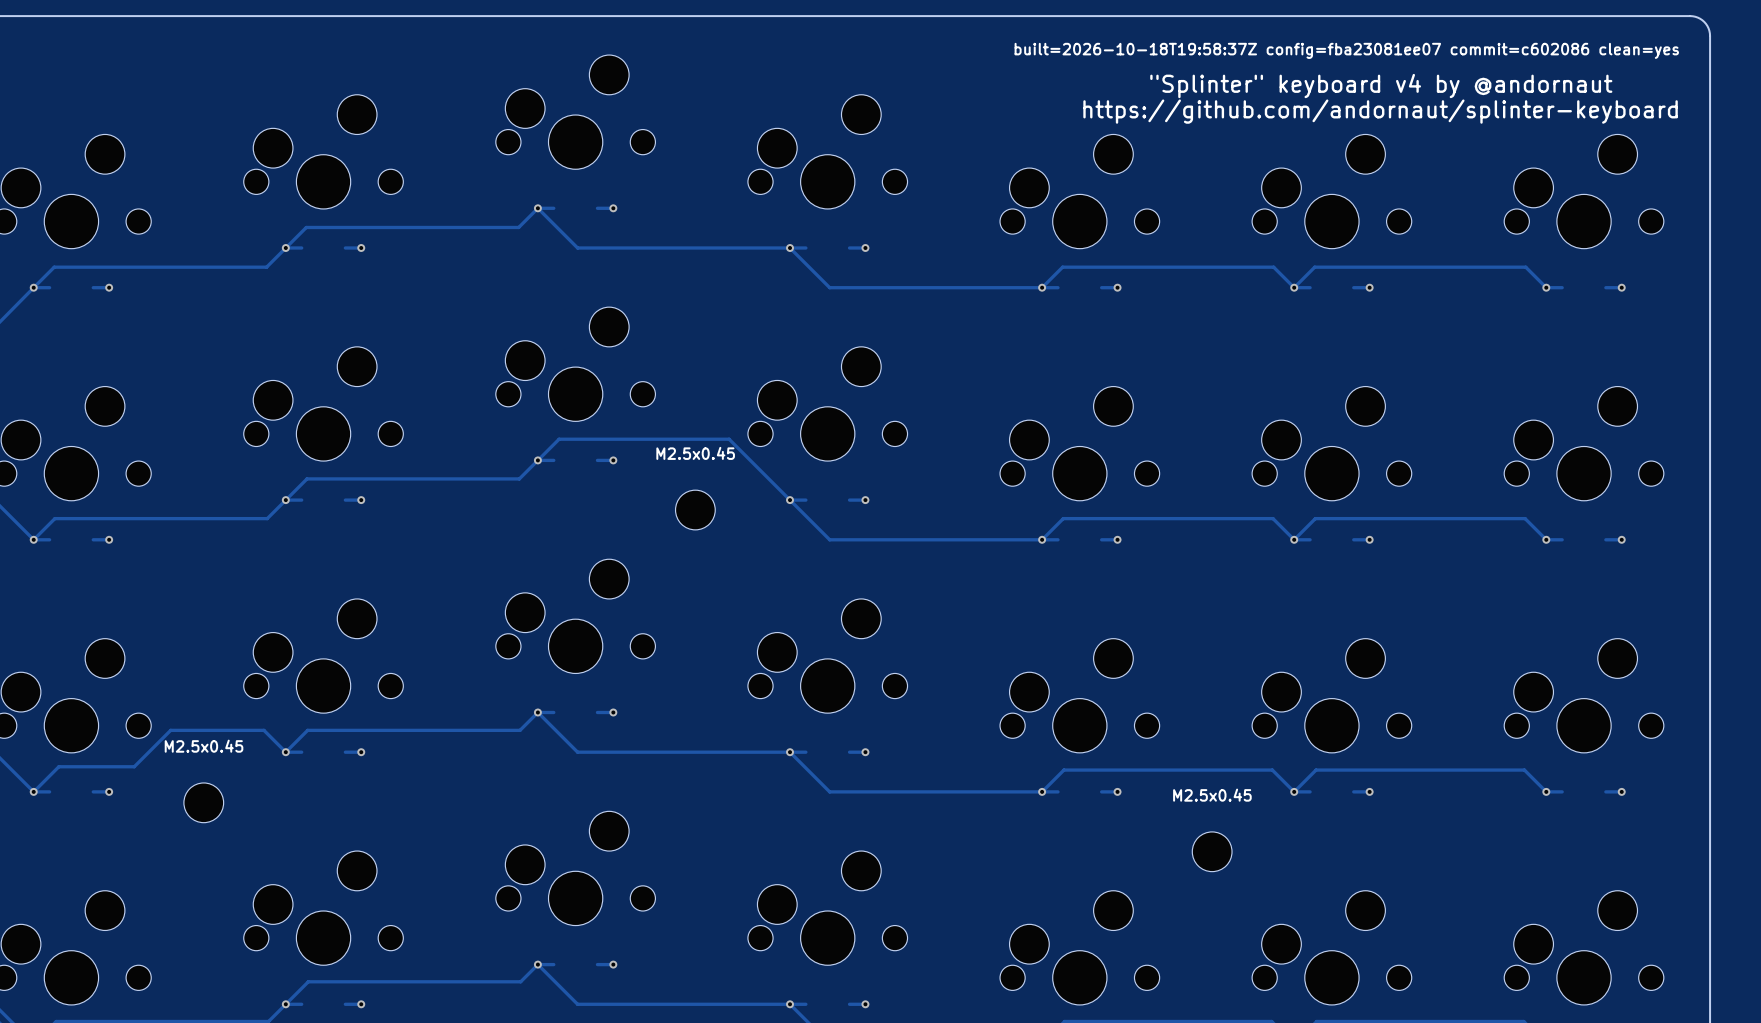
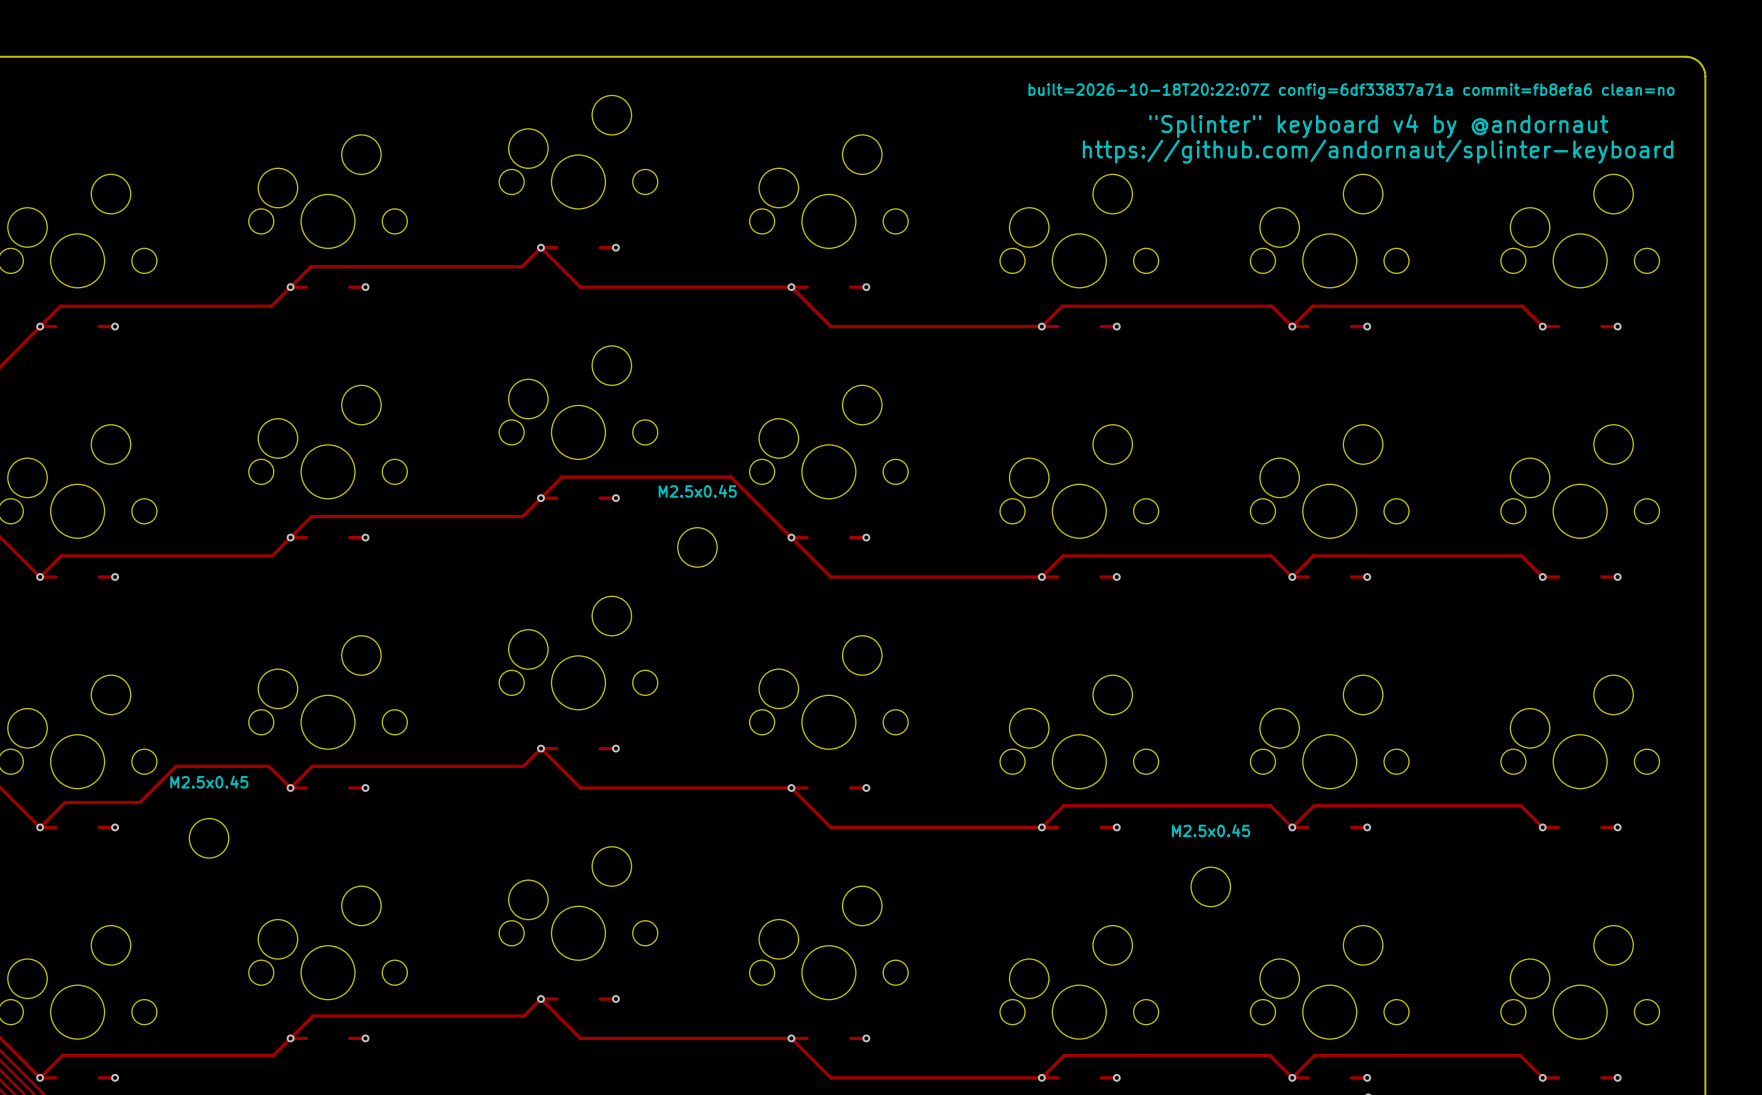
text: built=2026-10-18T19:58:37Z config=fba23081ee07 commit=c602086 clean=yes (1346, 50) -> built=2026-10-18T20:22:07Z config=6df33837a71a commit=fb8efa6 clean=no (1351, 91)

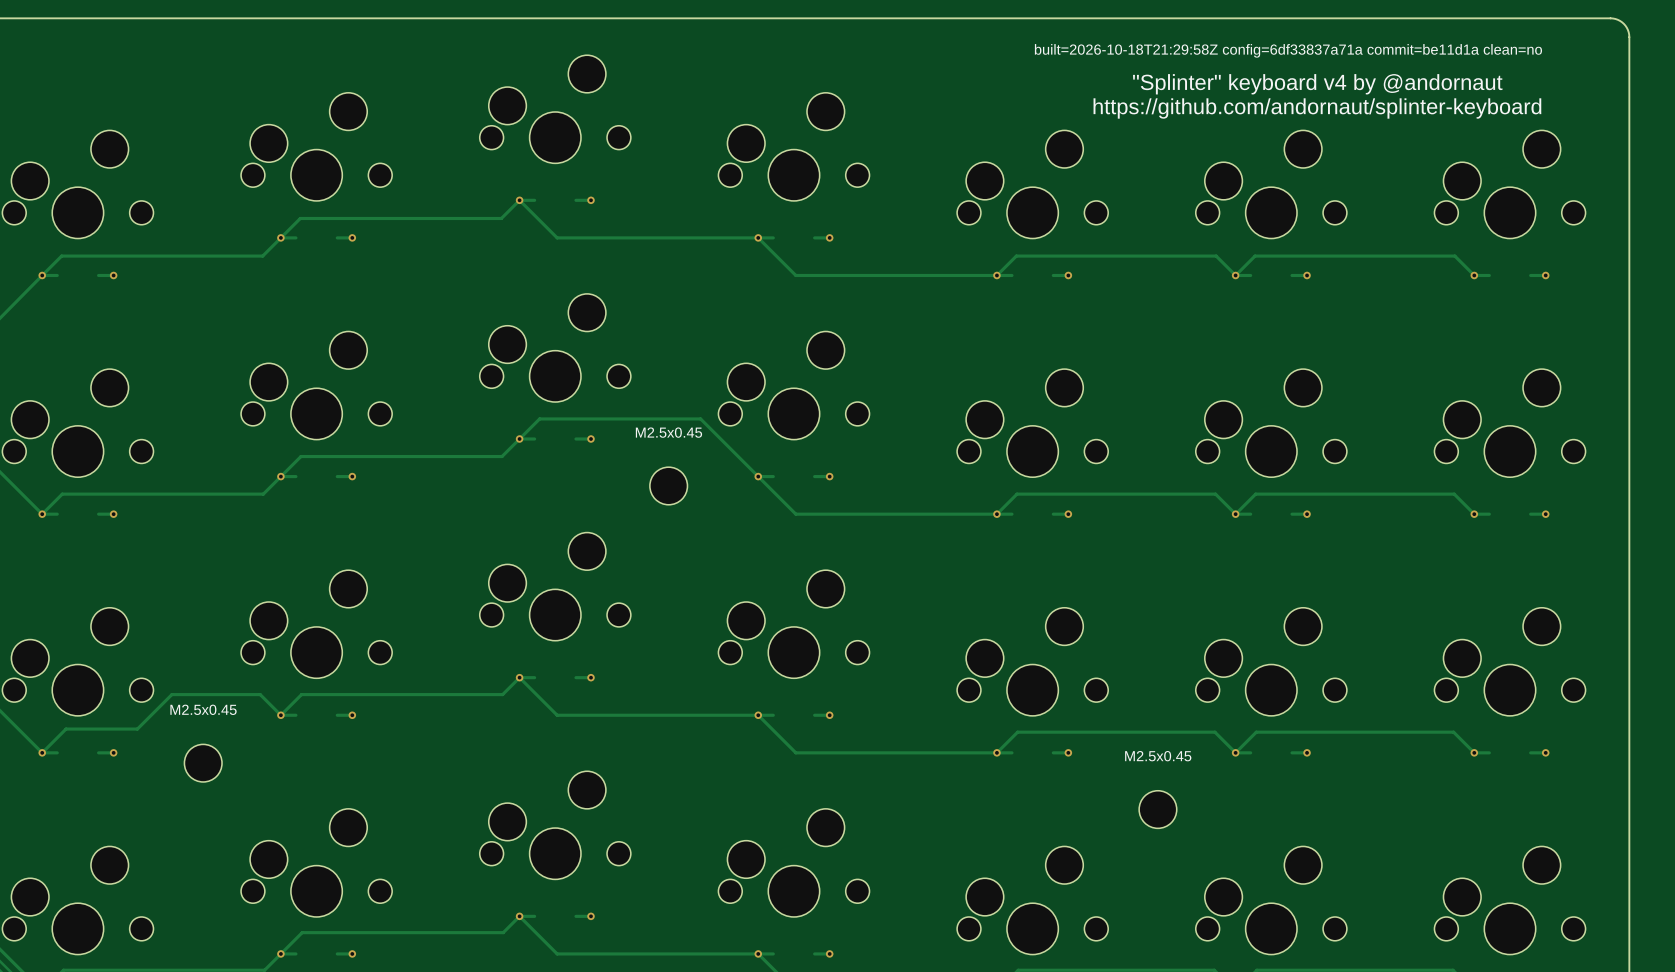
text: built=2026-10-18T20:22:07Z config=6df33837a71a commit=fb8efa6 clean=no (1351, 91) -> built=2026-10-18T21:29:58Z config=6df33837a71a commit=be11d1a clean=no (1288, 50)

